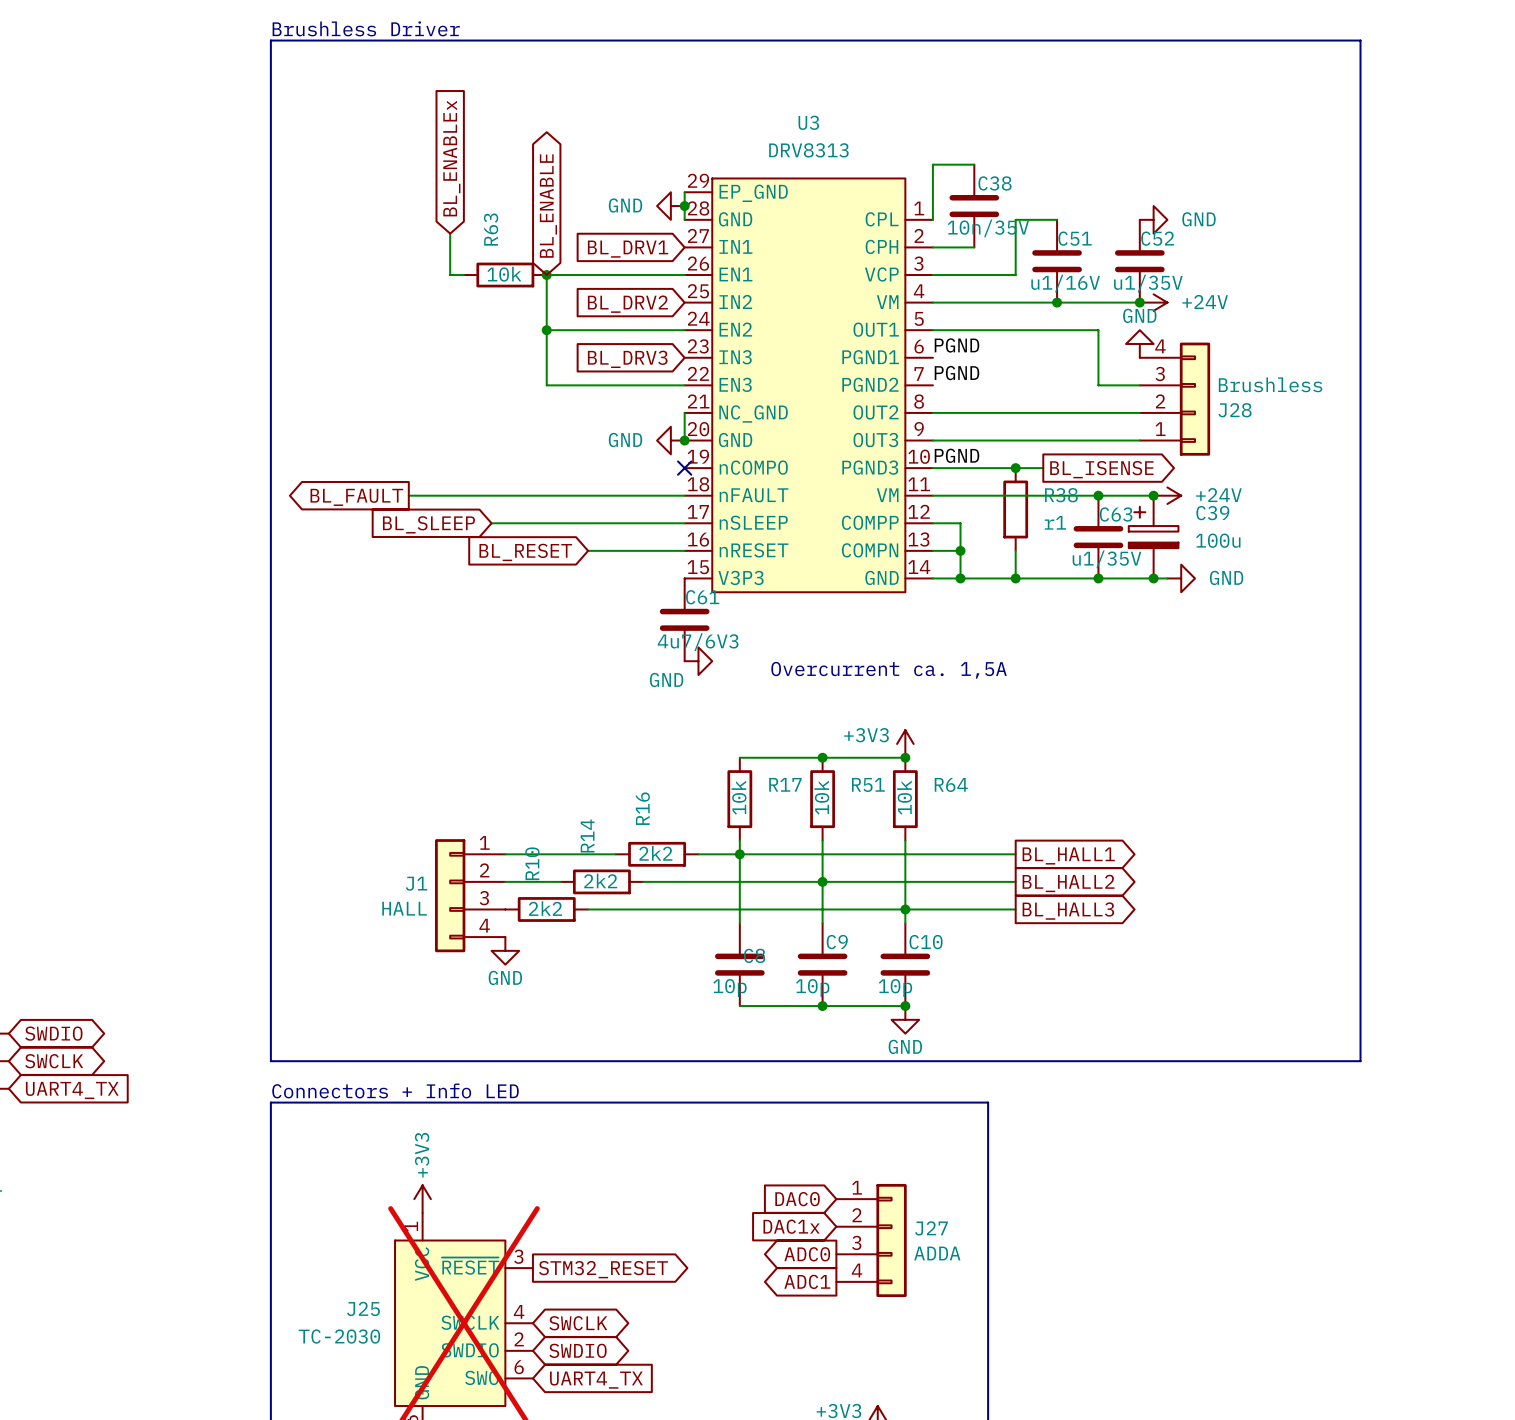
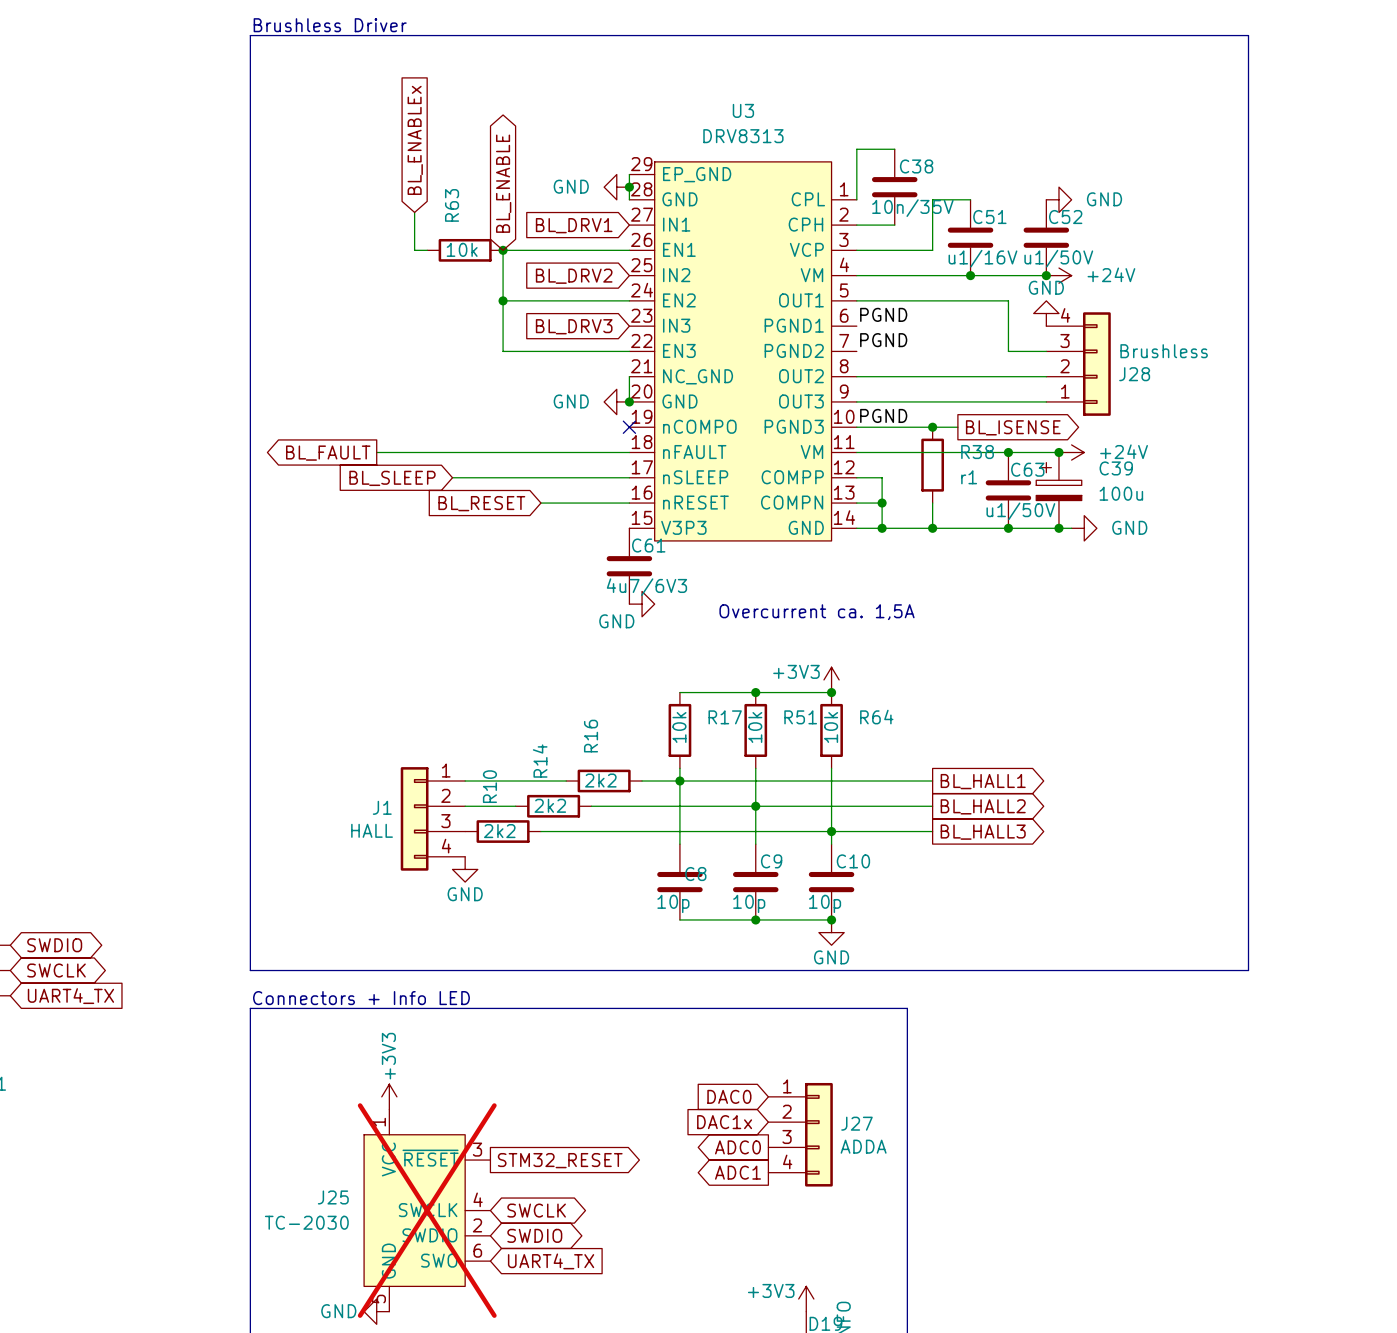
C52 value: u1/35V (1148, 283) -> u1/50V (1058, 258)
C63 value: u1/35V (1106, 559) -> u1/50V (1020, 511)

